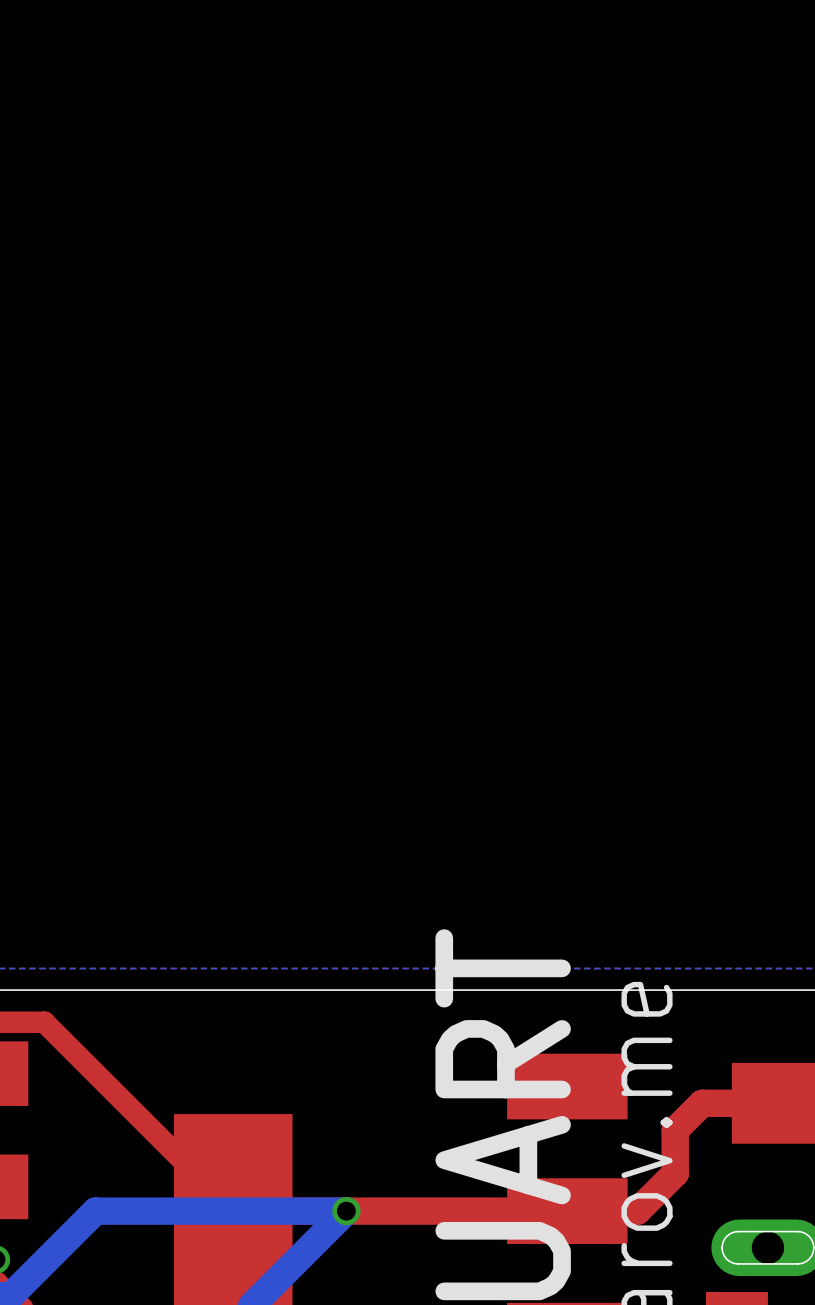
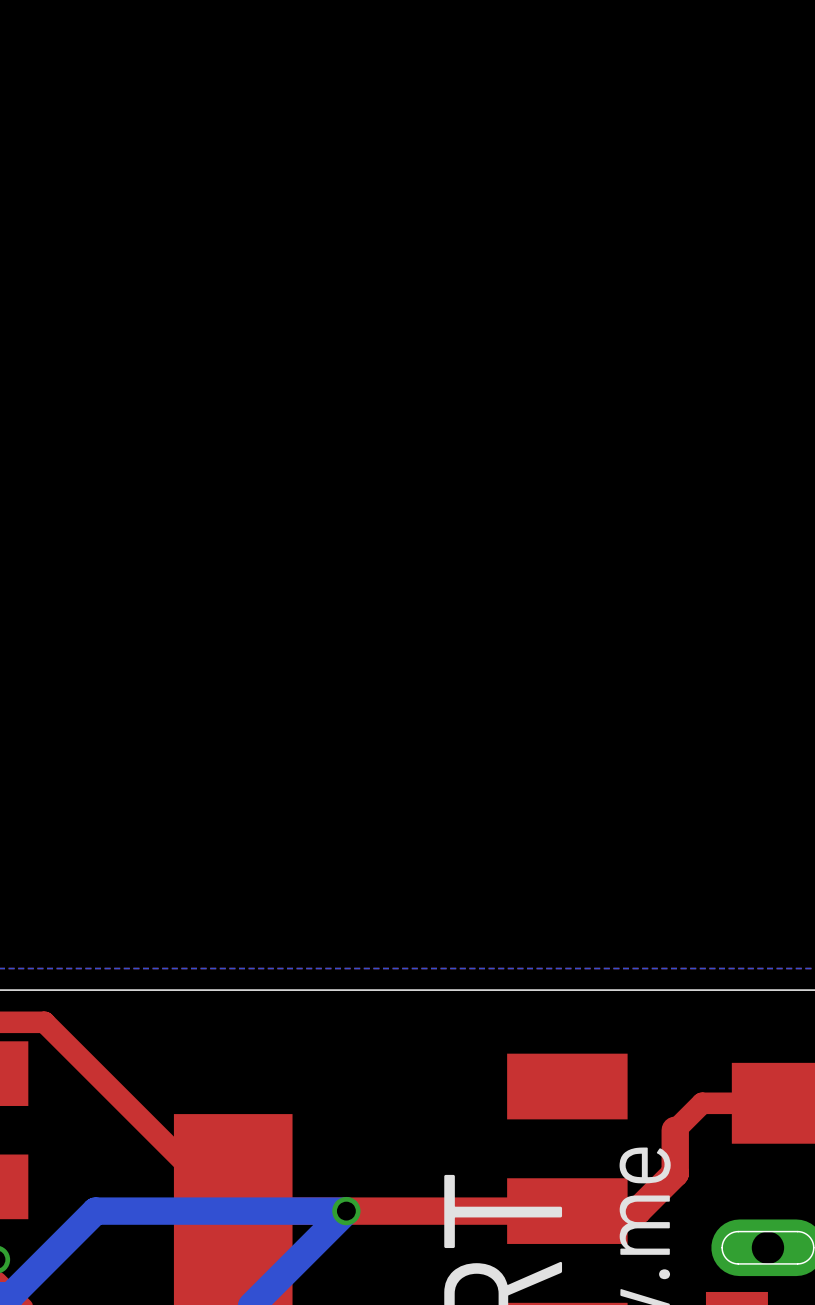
top track width: thick (784, 1103) (702, 1103) (675, 1130) -> thin (784, 1103) (702, 1103) (675, 1130)

